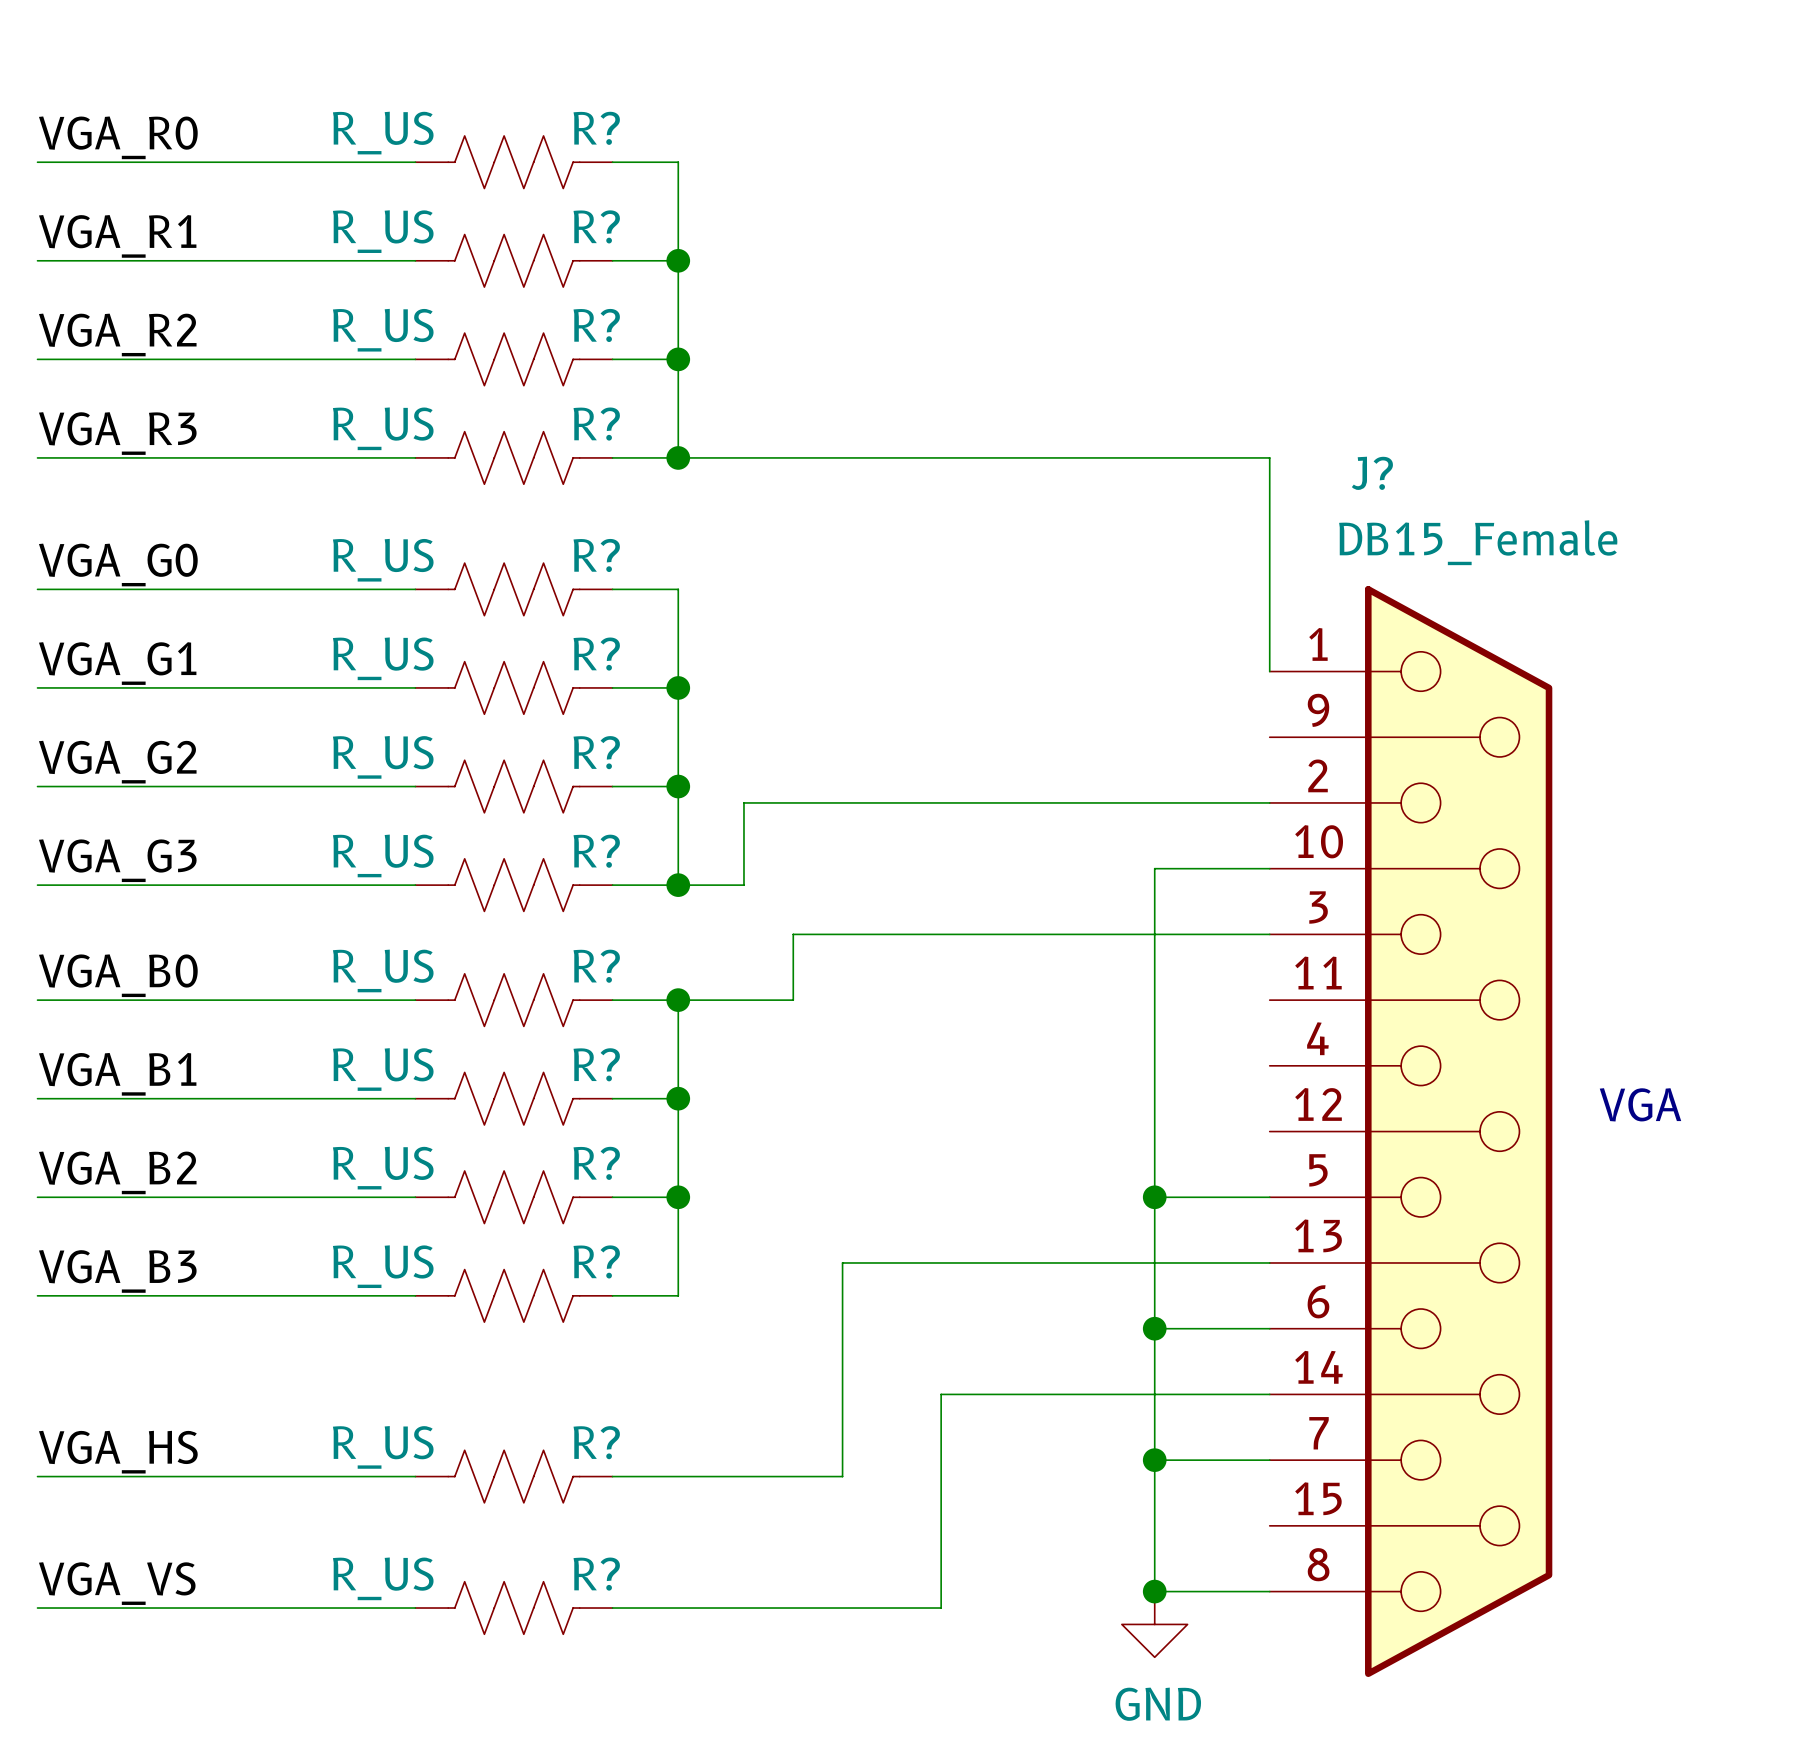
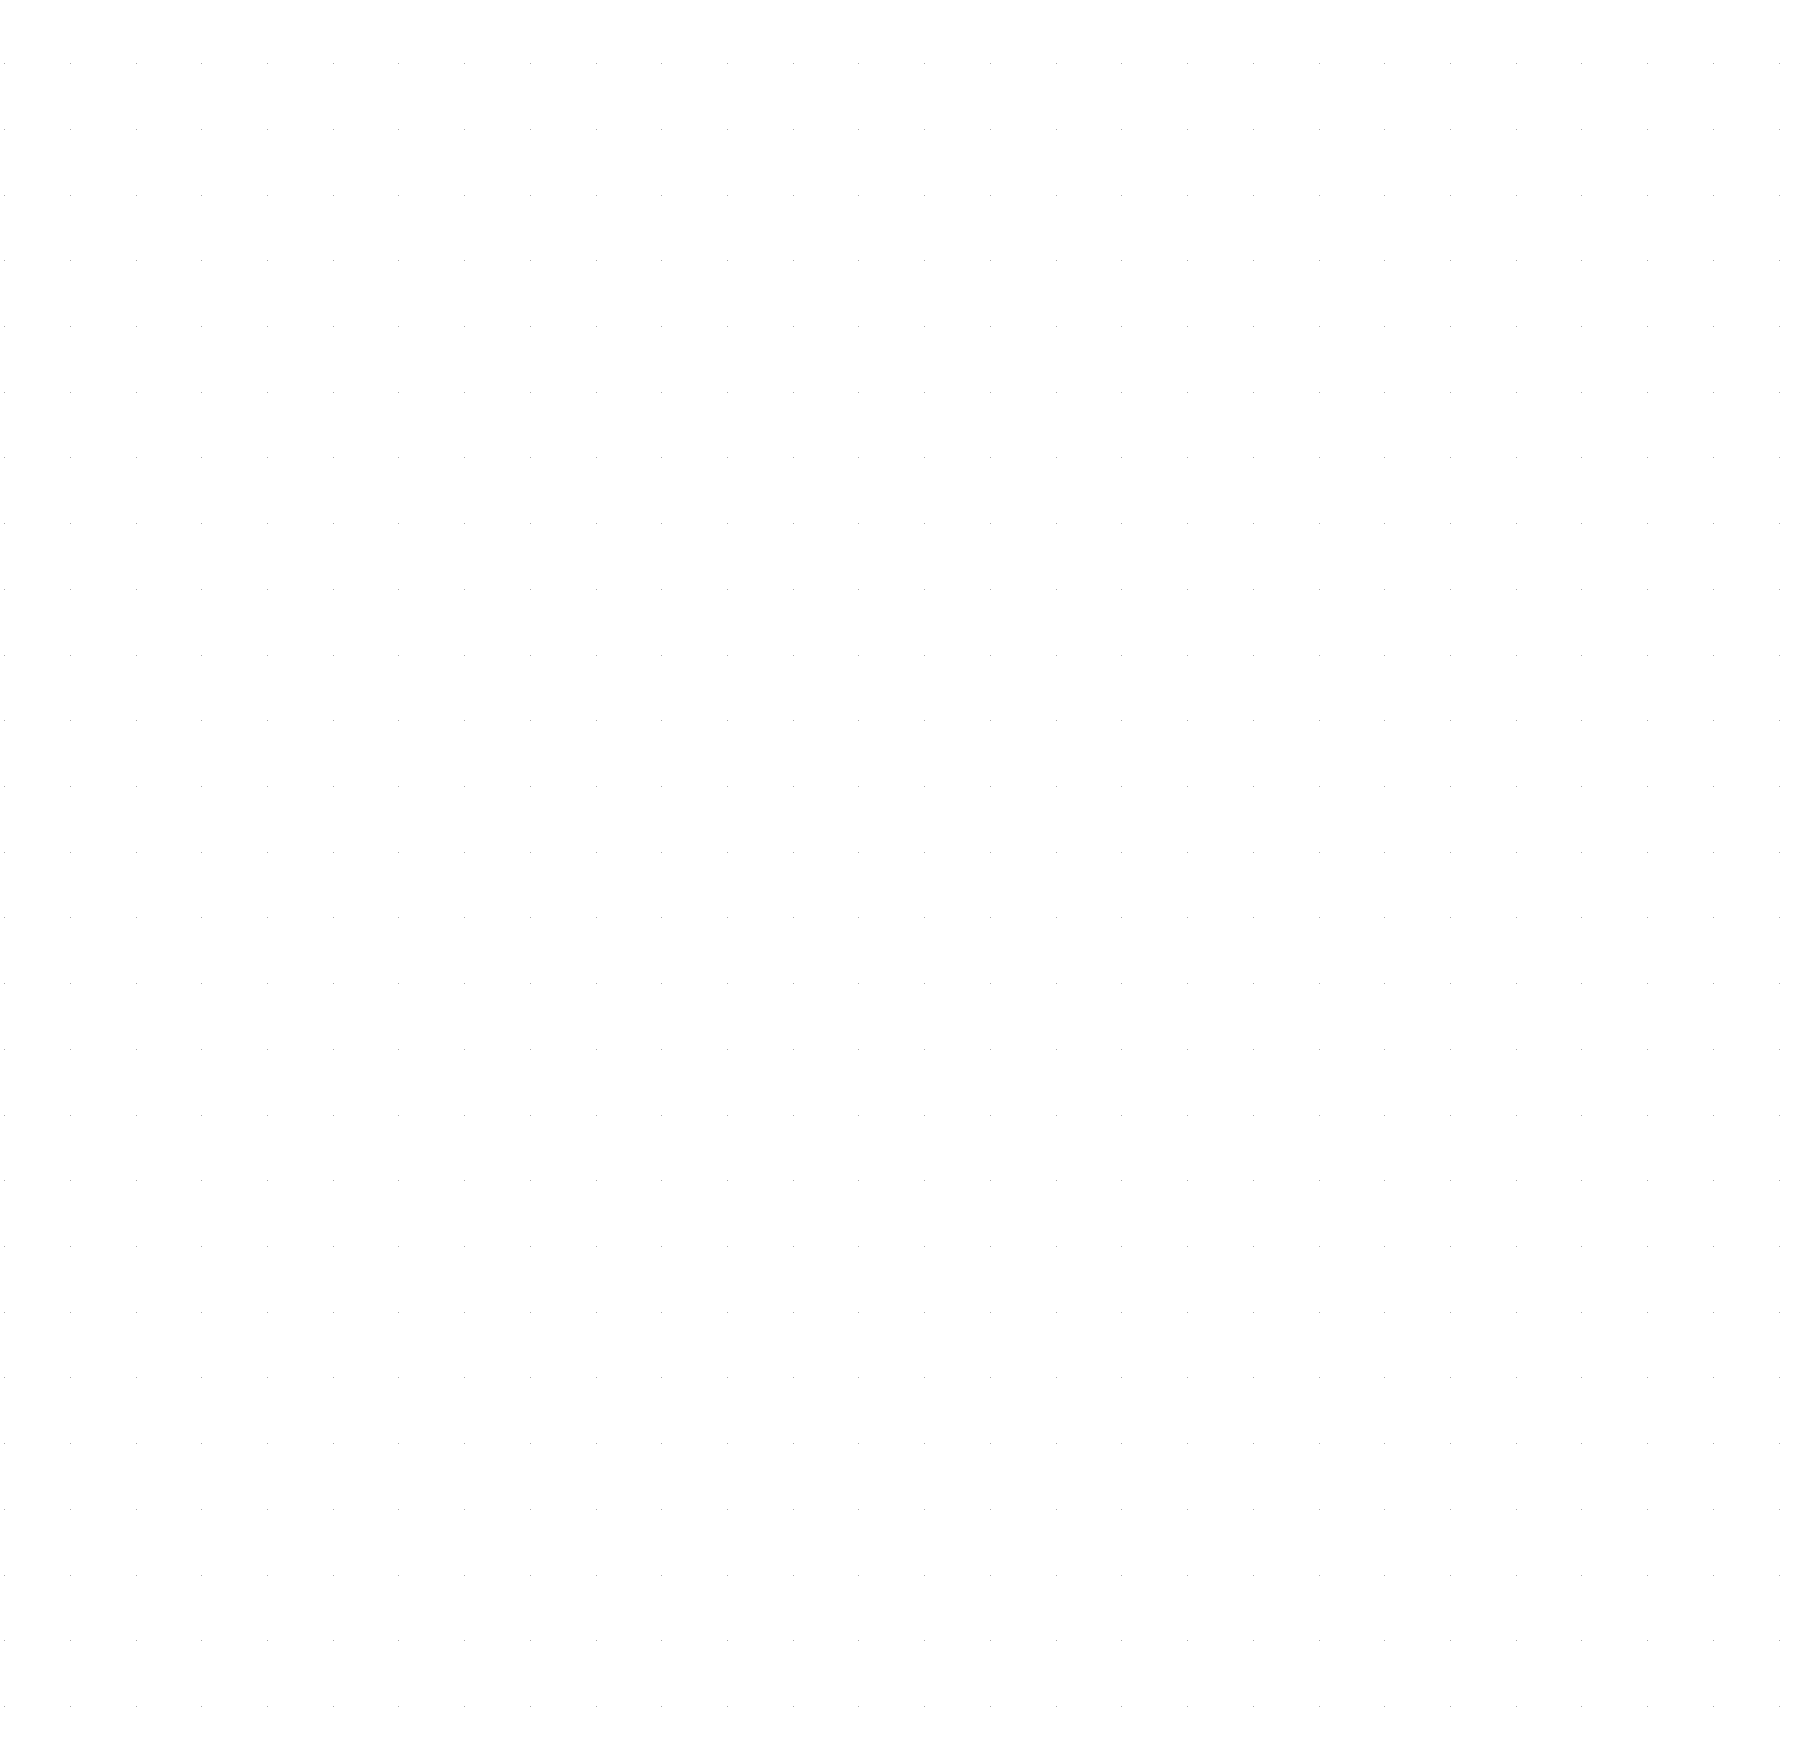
label: VGA_R0 (118, 137) -> none
wire: (37, 162) (415, 162) -> none
R?: R_US (513, 162) -> none
wire: (612, 162) (678, 162) (678, 457) -> none
label: VGA_R1 (117, 236) -> none
wire: (37, 260) (415, 260) -> none
R?: R_US (513, 260) -> none
wire: (612, 260) (678, 260) -> none
junction: (678, 260) -> none
label: VGA_R2 (117, 334) -> none
wire: (37, 359) (415, 359) -> none
R?: R_US (513, 359) -> none
wire: (612, 359) (678, 359) -> none
junction: (678, 359) -> none
label: VGA_R3 (117, 433) -> none
wire: (37, 457) (415, 457) -> none
R?: R_US (513, 457) -> none
wire: (612, 457) (1269, 457) (1269, 671) -> none
junction: (678, 457) -> none
label: VGA_G0 (118, 564) -> none
wire: (37, 589) (415, 589) -> none
R?: R_US (513, 589) -> none
wire: (612, 589) (678, 589) (678, 885) -> none
label: VGA_G1 (117, 663) -> none
wire: (37, 687) (415, 687) -> none
R?: R_US (513, 687) -> none
wire: (612, 687) (678, 687) -> none
junction: (678, 687) -> none
label: VGA_G2 (117, 762) -> none
wire: (37, 786) (415, 786) -> none
R?: R_US (513, 786) -> none
wire: (612, 786) (678, 786) -> none
junction: (678, 786) -> none
wire: (1269, 802) (743, 802) (743, 885) (612, 885) -> none
label: VGA_G3 (117, 860) -> none
wire: (1269, 868) (1154, 868) (1154, 1591) (1269, 1591) -> none
wire: (37, 885) (415, 885) -> none
R?: R_US (513, 885) -> none
junction: (678, 885) -> none
wire: (1269, 934) (793, 934) (793, 1000) (612, 1000) -> none
label: VGA_B0 (118, 975) -> none
wire: (37, 1000) (415, 1000) -> none
R?: R_US (513, 1000) -> none
wire: (678, 1000) (678, 1295) (612, 1295) -> none
junction: (678, 1000) -> none
label: VGA_B1 (117, 1074) -> none
wire: (37, 1098) (415, 1098) -> none
R?: R_US (513, 1098) -> none
wire: (612, 1098) (678, 1098) -> none
junction: (678, 1098) -> none
text: VGA (1640, 1104) -> none
J?: DB15_Female (1411, 1131) -> none
label: VGA_B2 (117, 1172) -> none
wire: (37, 1197) (415, 1197) -> none
R?: R_US (513, 1197) -> none
wire: (612, 1197) (678, 1197) -> none
junction: (678, 1197) -> none
wire: (1154, 1197) (1269, 1197) -> none
junction: (1154, 1197) -> none
wire: (1269, 1262) (842, 1262) (842, 1476) (612, 1476) -> none
label: VGA_B3 (117, 1271) -> none
wire: (37, 1295) (415, 1295) -> none
R?: R_US (513, 1295) -> none
wire: (1154, 1328) (1269, 1328) -> none
junction: (1154, 1328) -> none
wire: (1269, 1394) (941, 1394) (941, 1608) (612, 1608) -> none
label: VGA_HS (118, 1452) -> none
wire: (1154, 1460) (1269, 1460) -> none
junction: (1154, 1460) -> none
wire: (37, 1476) (415, 1476) -> none
R?: R_US (513, 1476) -> none
label: VGA_VS (117, 1583) -> none
junction: (1154, 1591) -> none
wire: (37, 1608) (415, 1608) -> none
R?: R_US (513, 1608) -> none
power symbol: GND (1154, 1624) -> none

